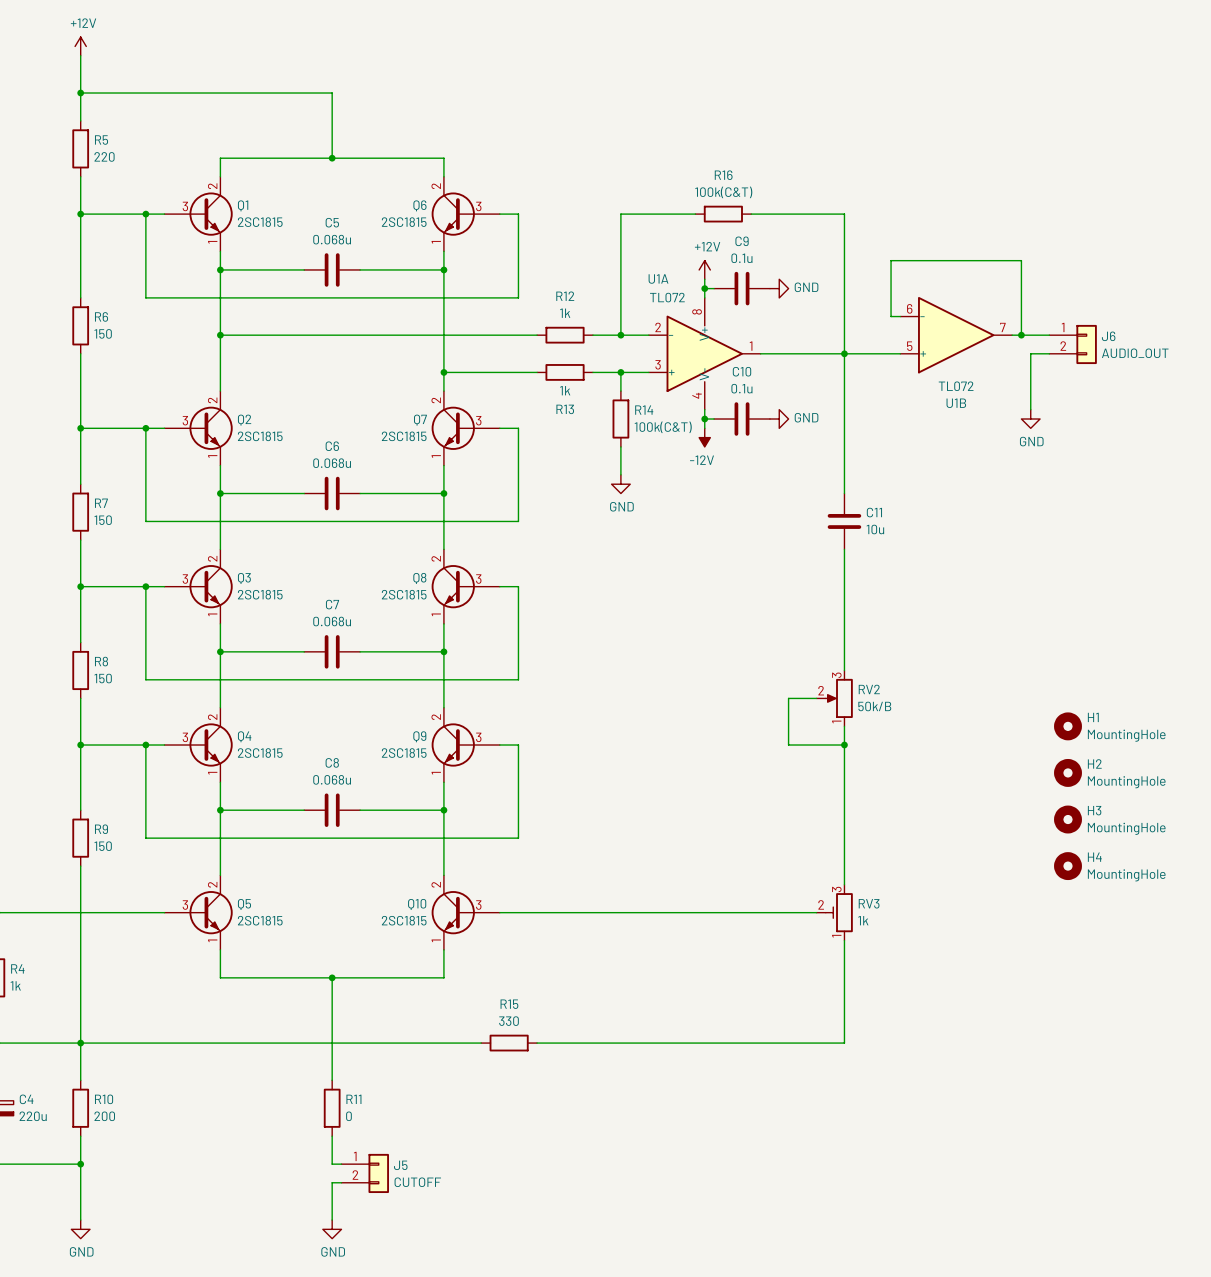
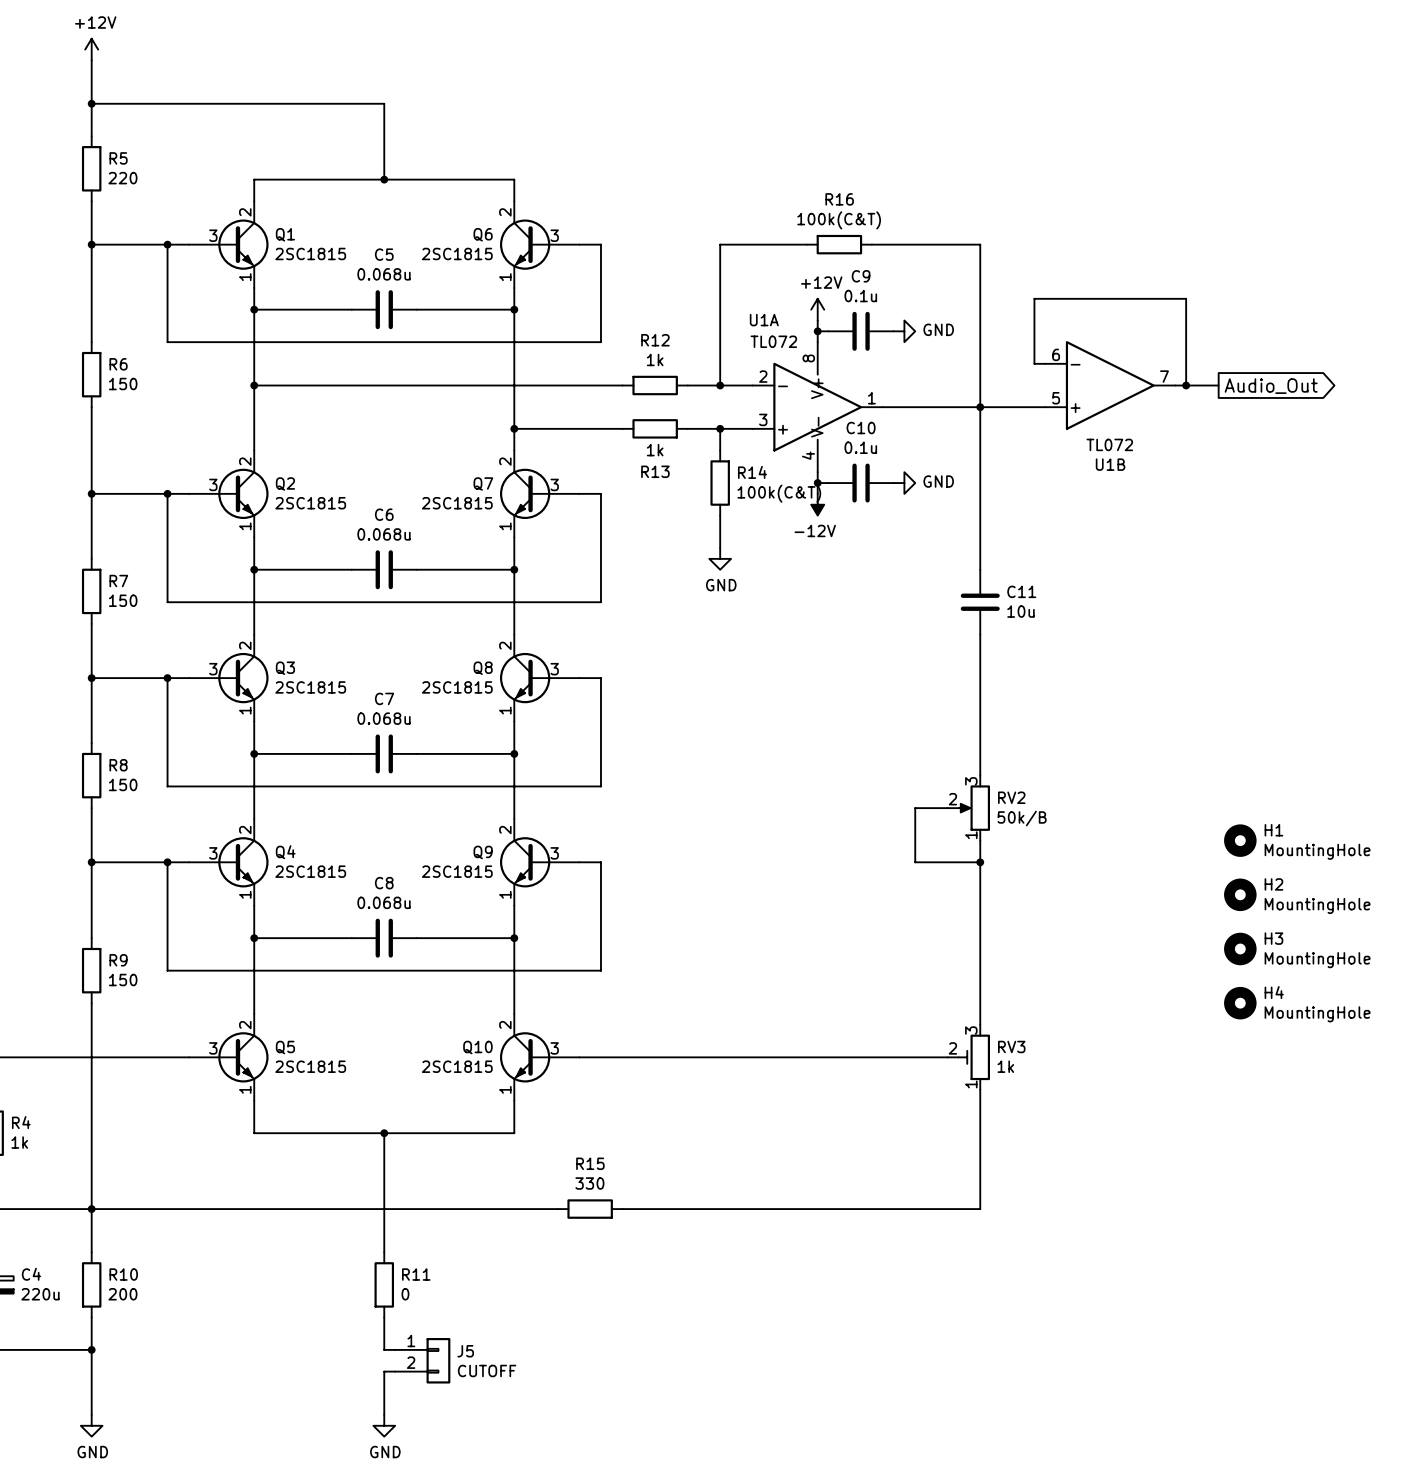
global label: none -> Audio_Out (1271, 386)
J6: AUDIO_OUT (1073, 344) -> none
wire: (1049, 353) (1030, 353) (1030, 409) -> none
power symbol: GND (1030, 419) -> none

